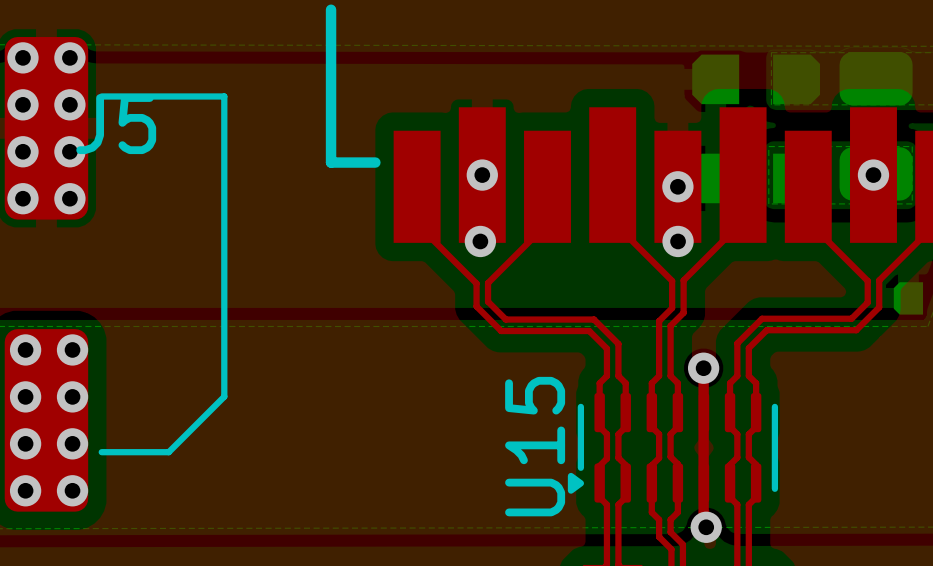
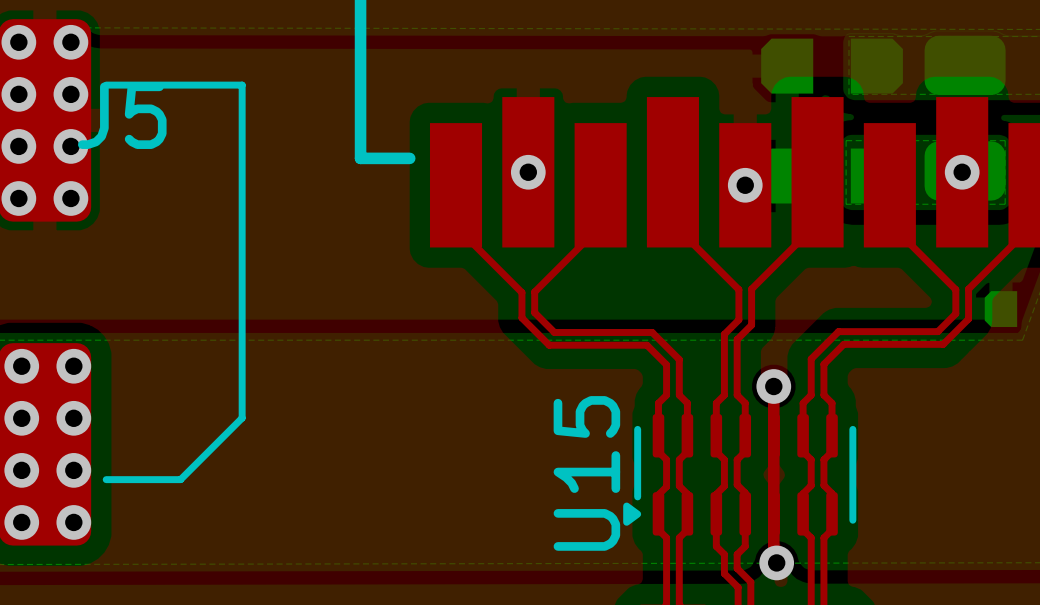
via: (480, 241) -> none
via: (678, 241) -> none

